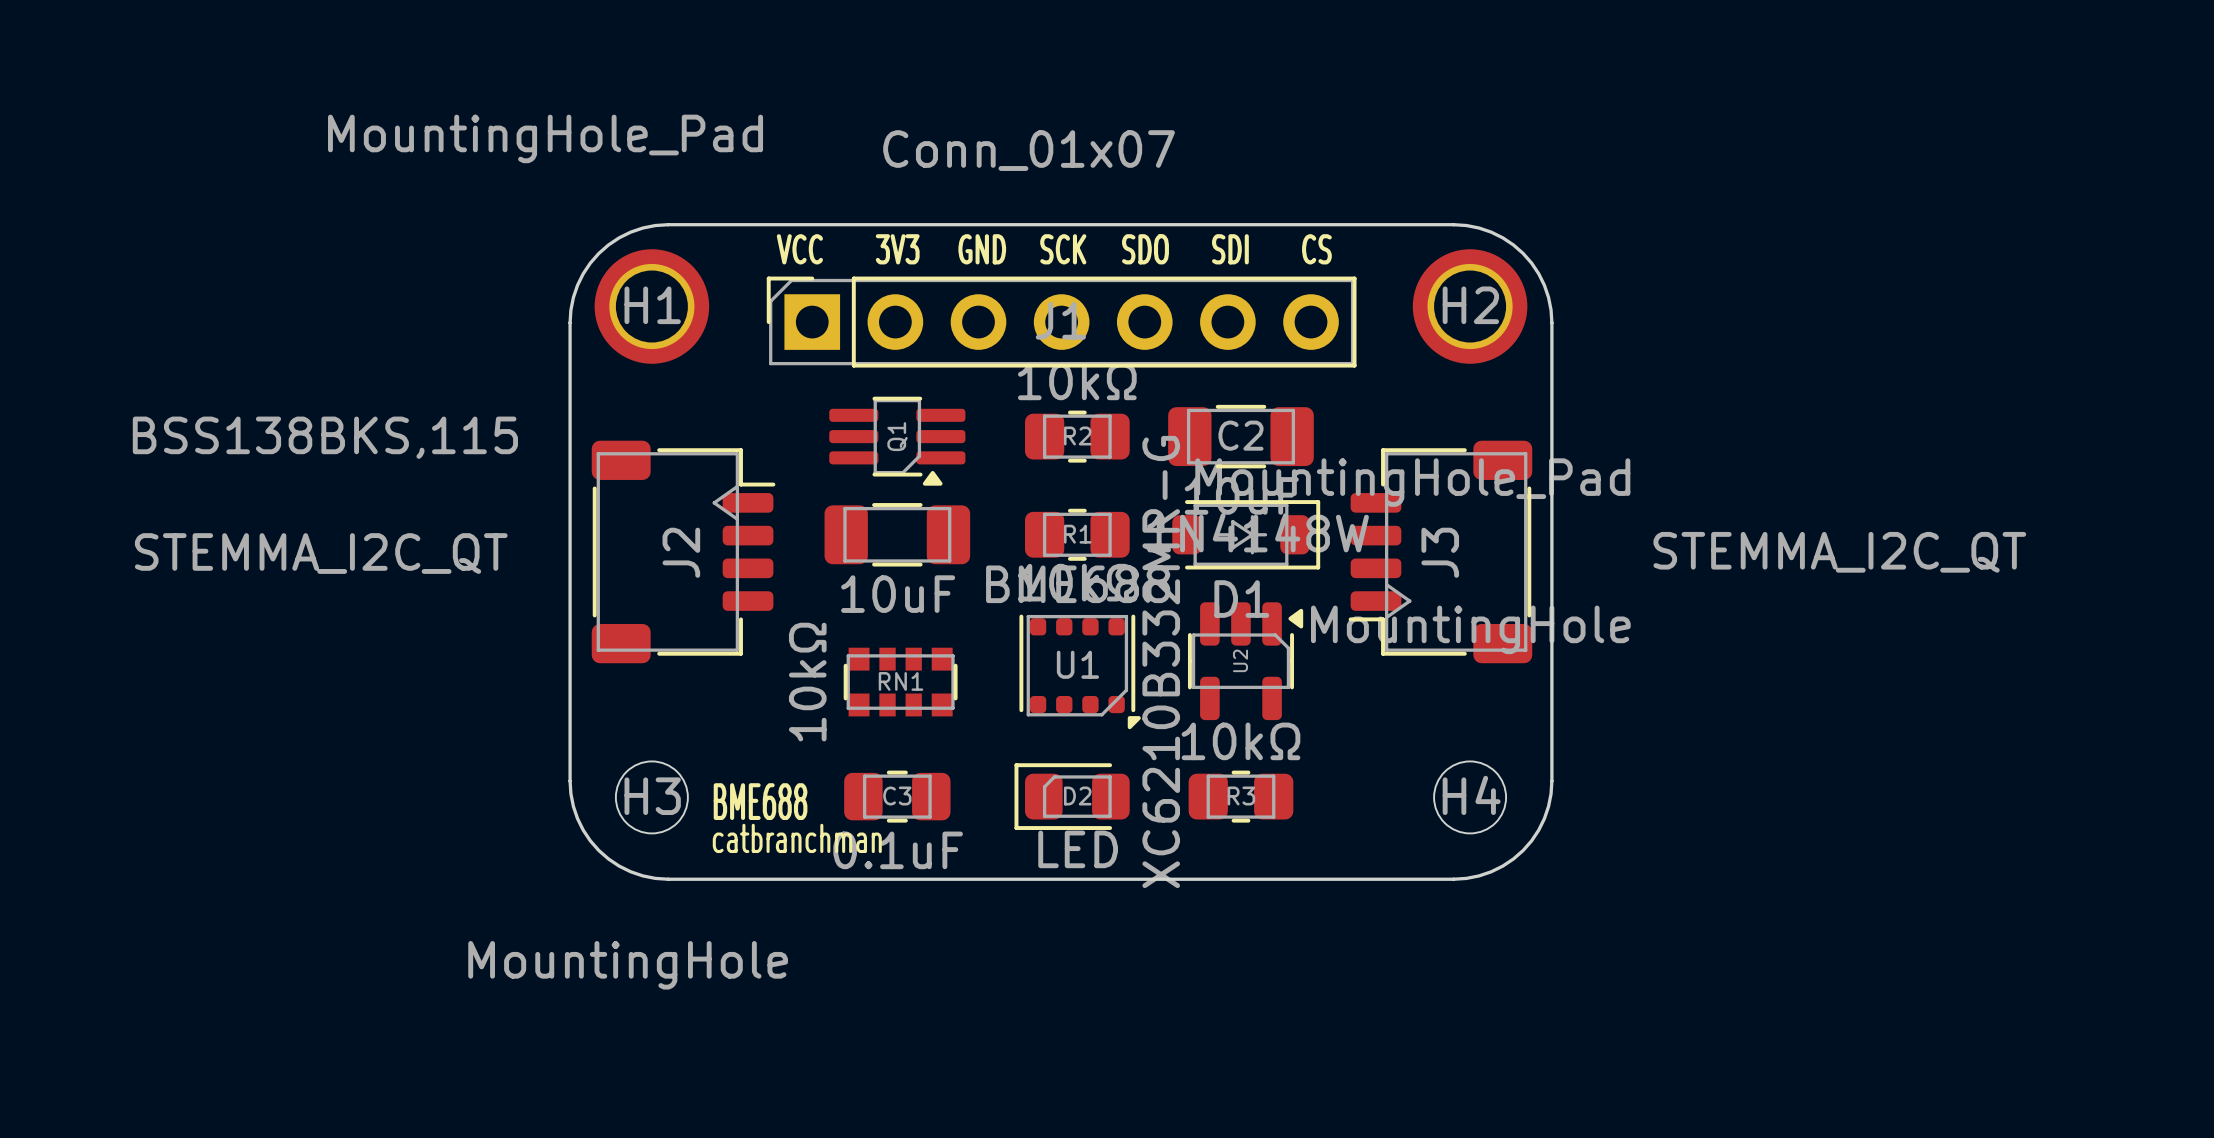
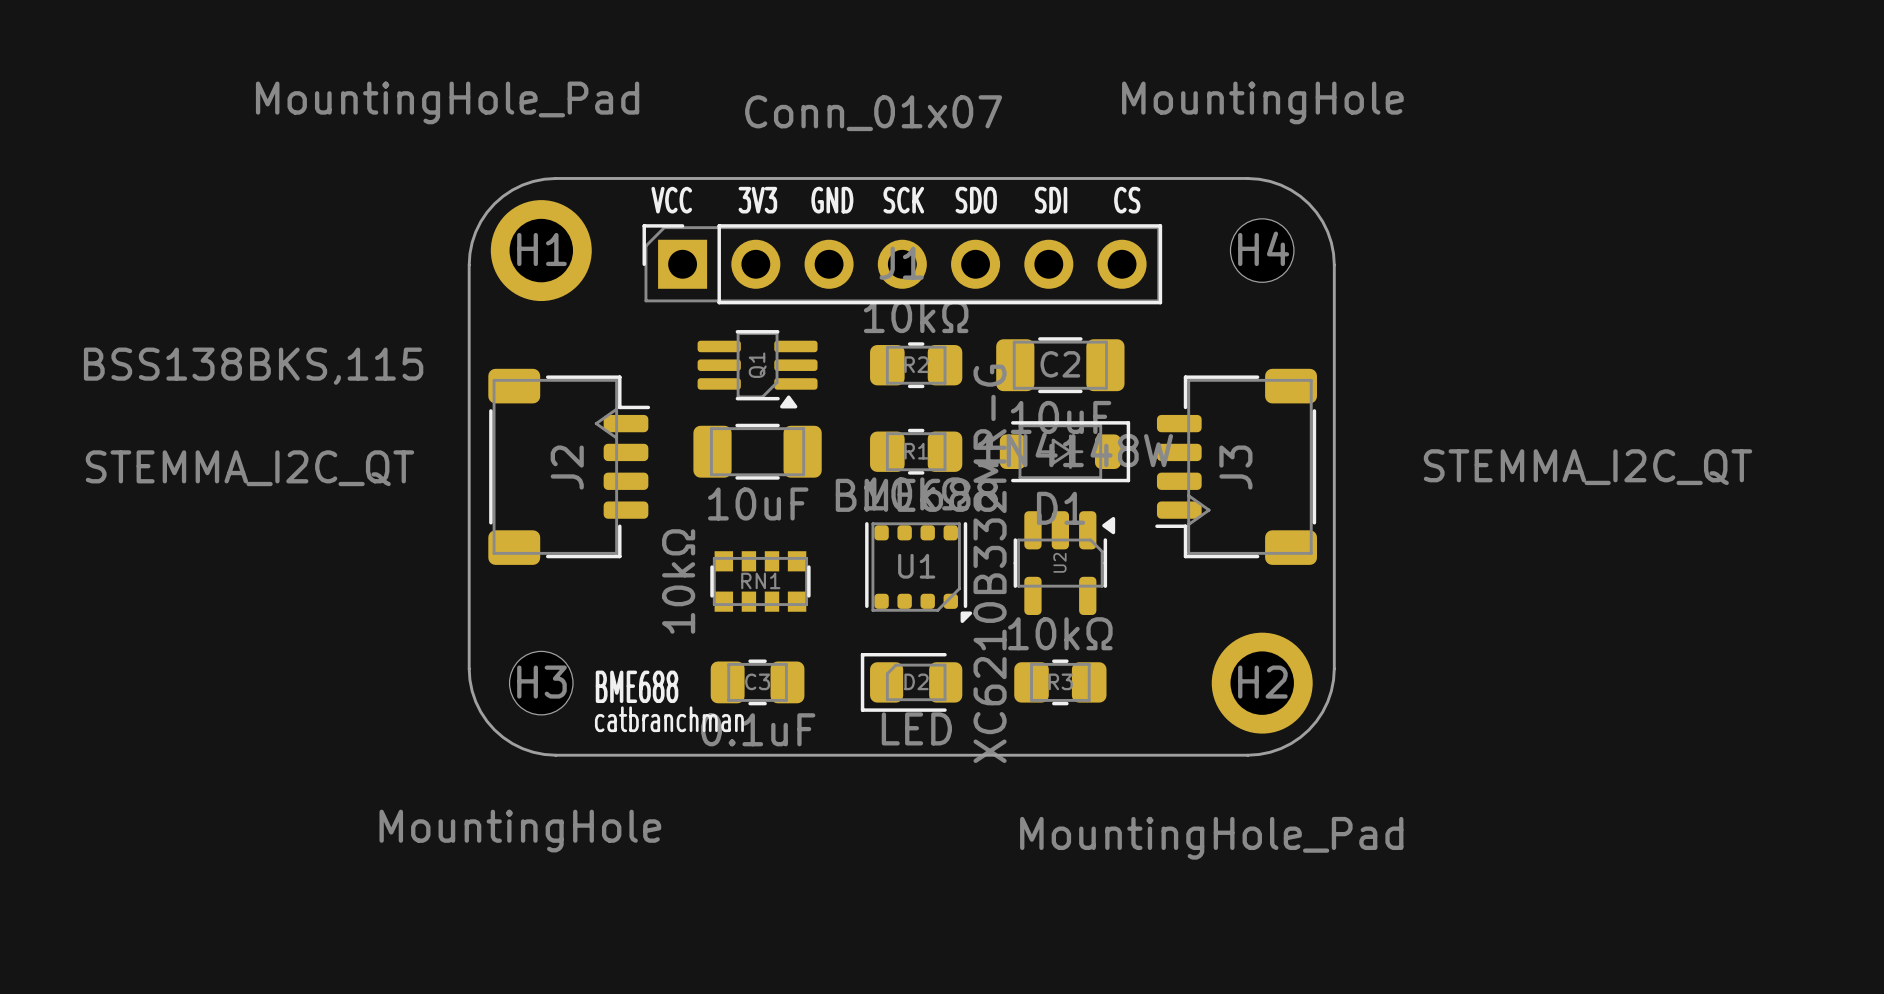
H2 position: (1470, 306) -> (1262, 683)
H4 position: (1470, 797) -> (1262, 250)

